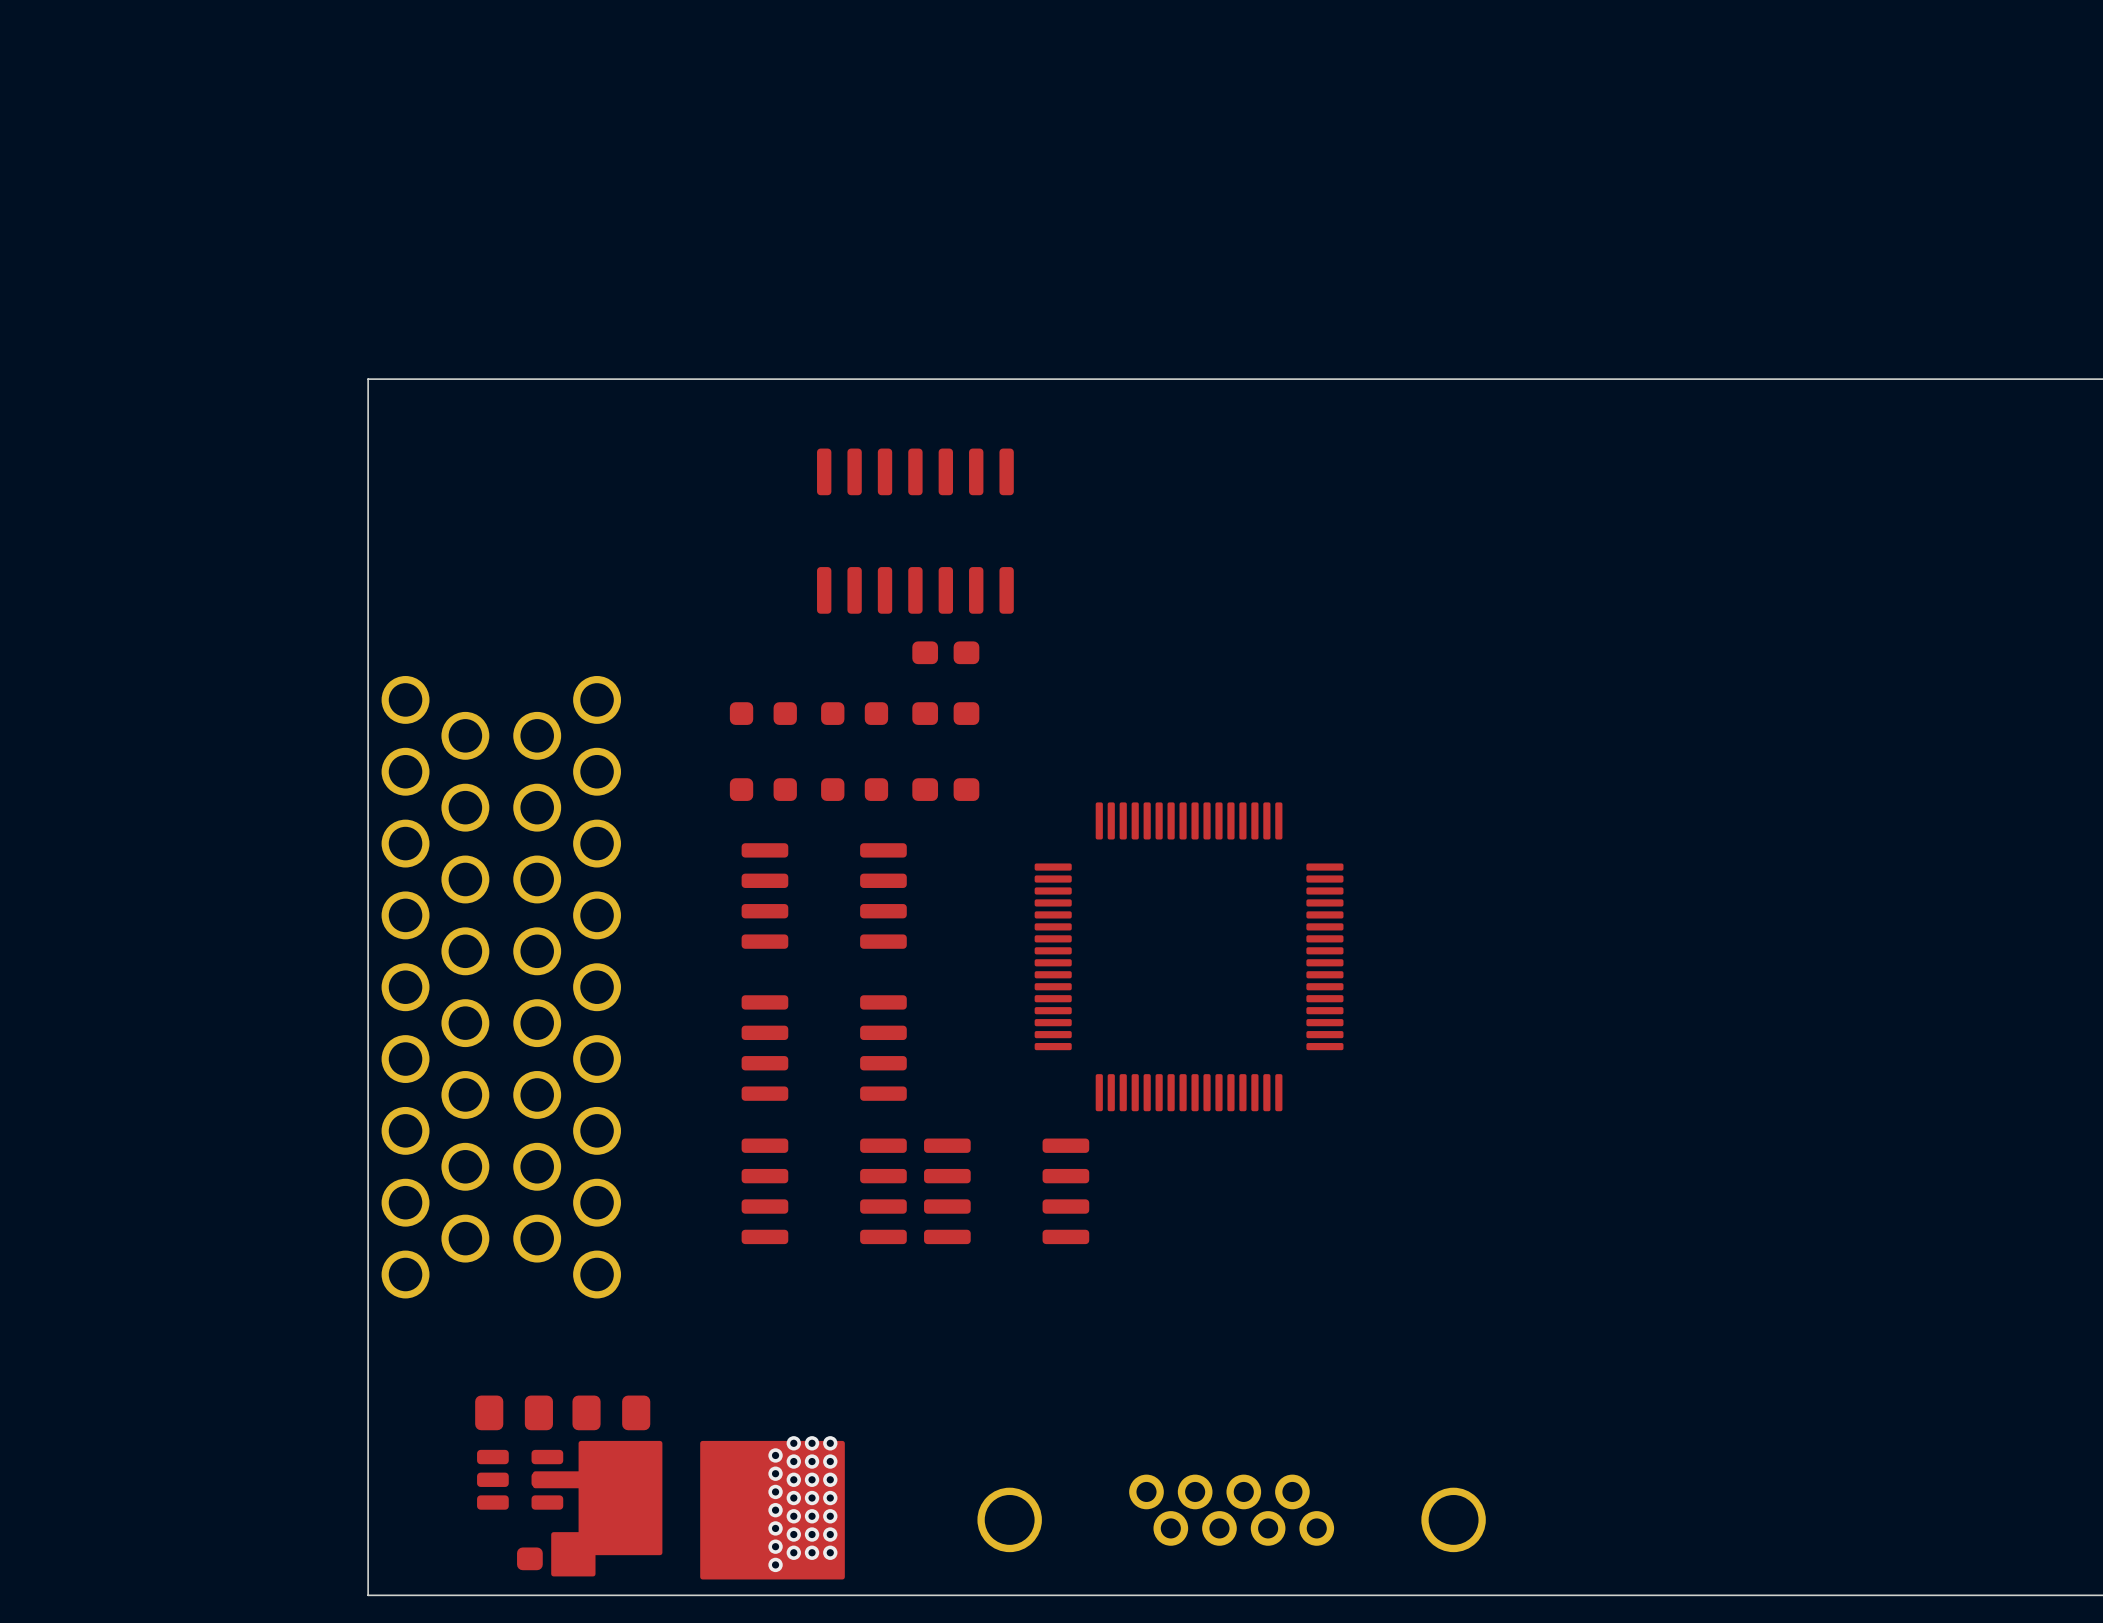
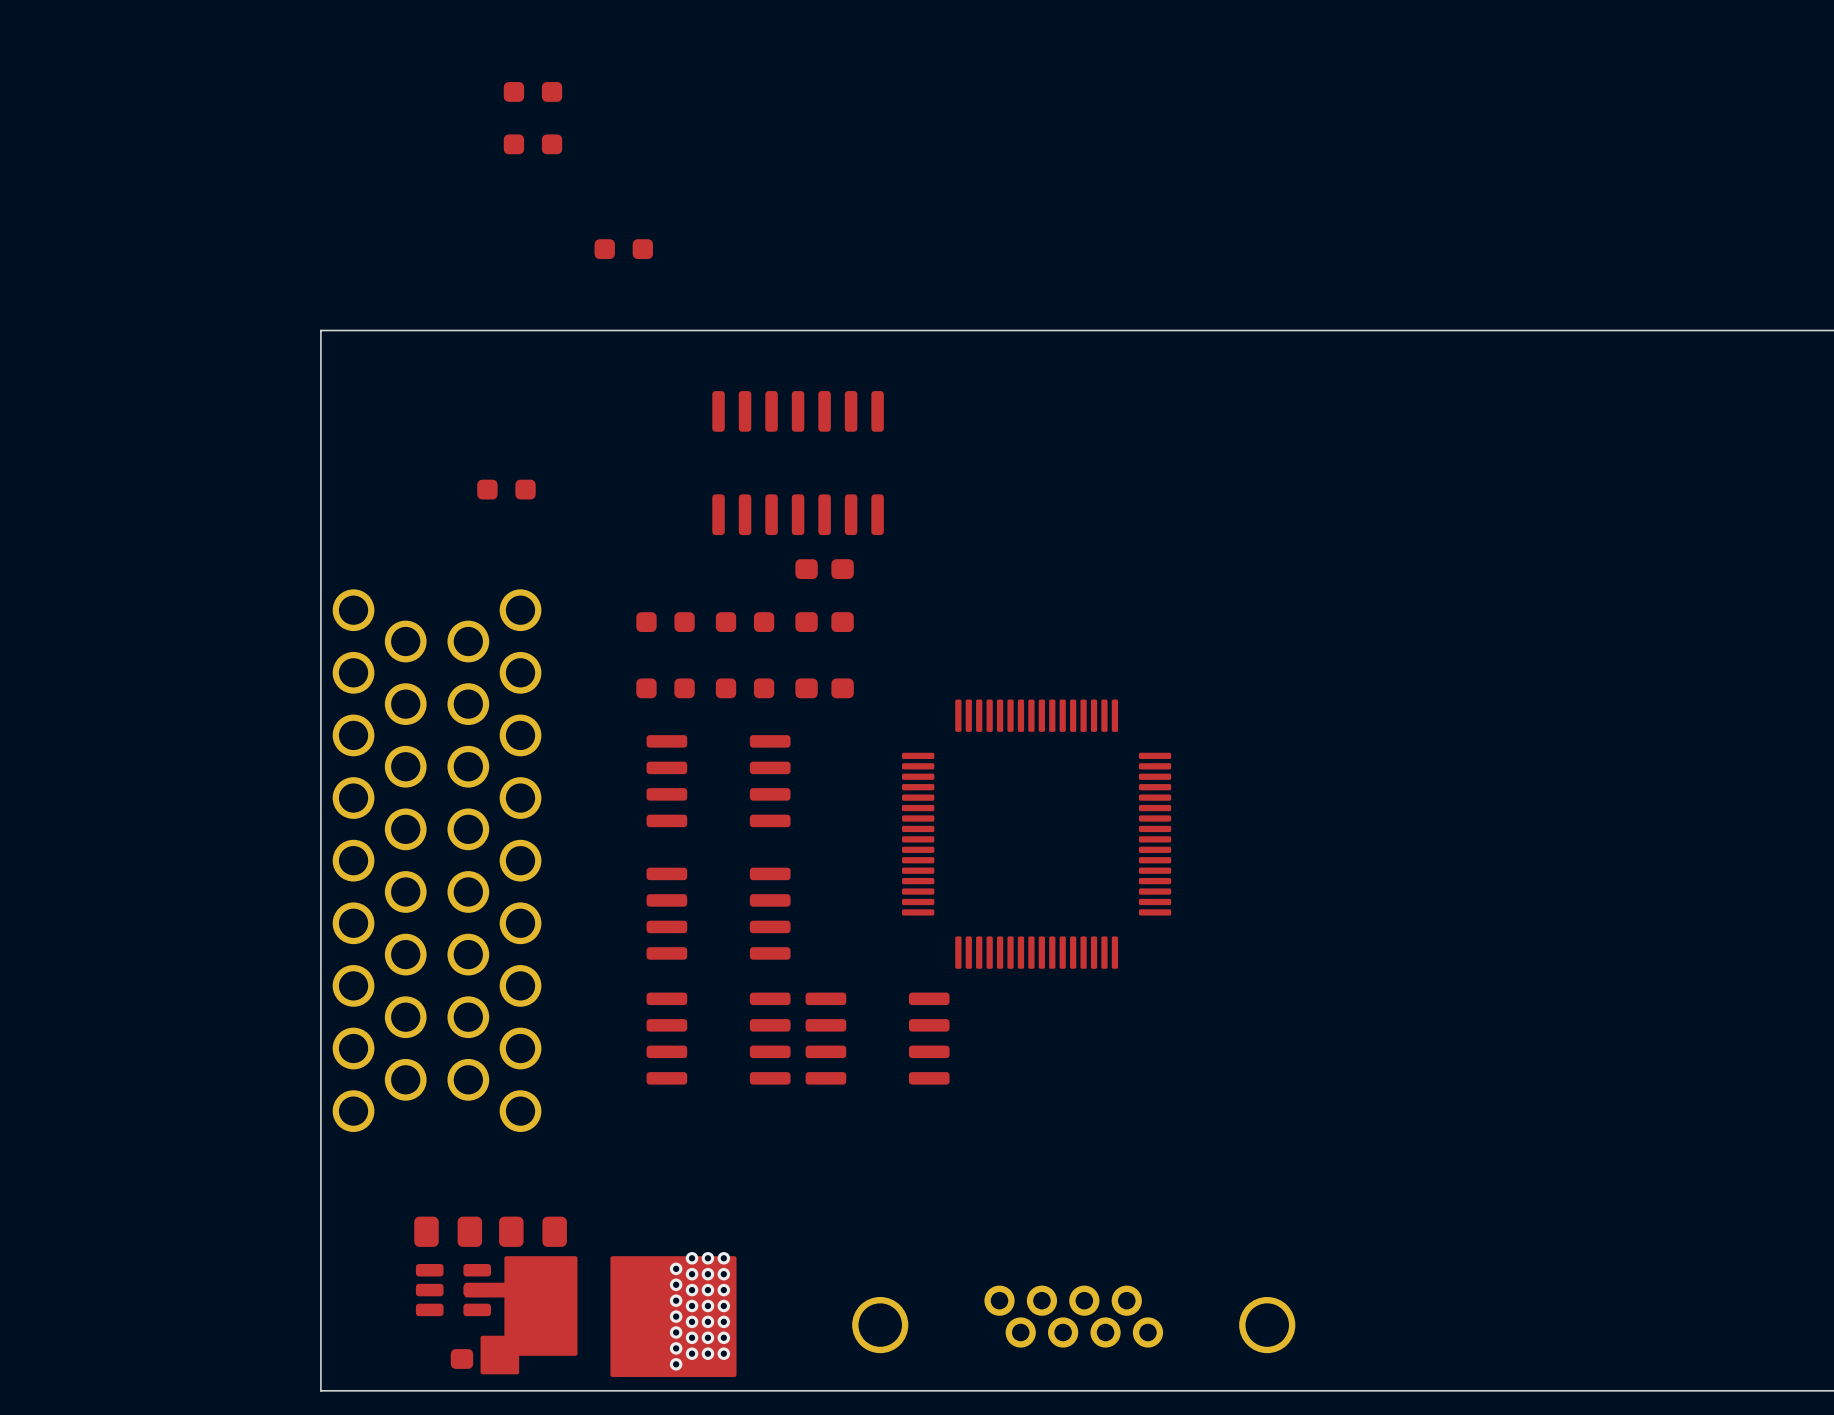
part: none -> (532, 91)
part: none -> (532, 144)
part: none -> (623, 249)
part: none -> (506, 489)

